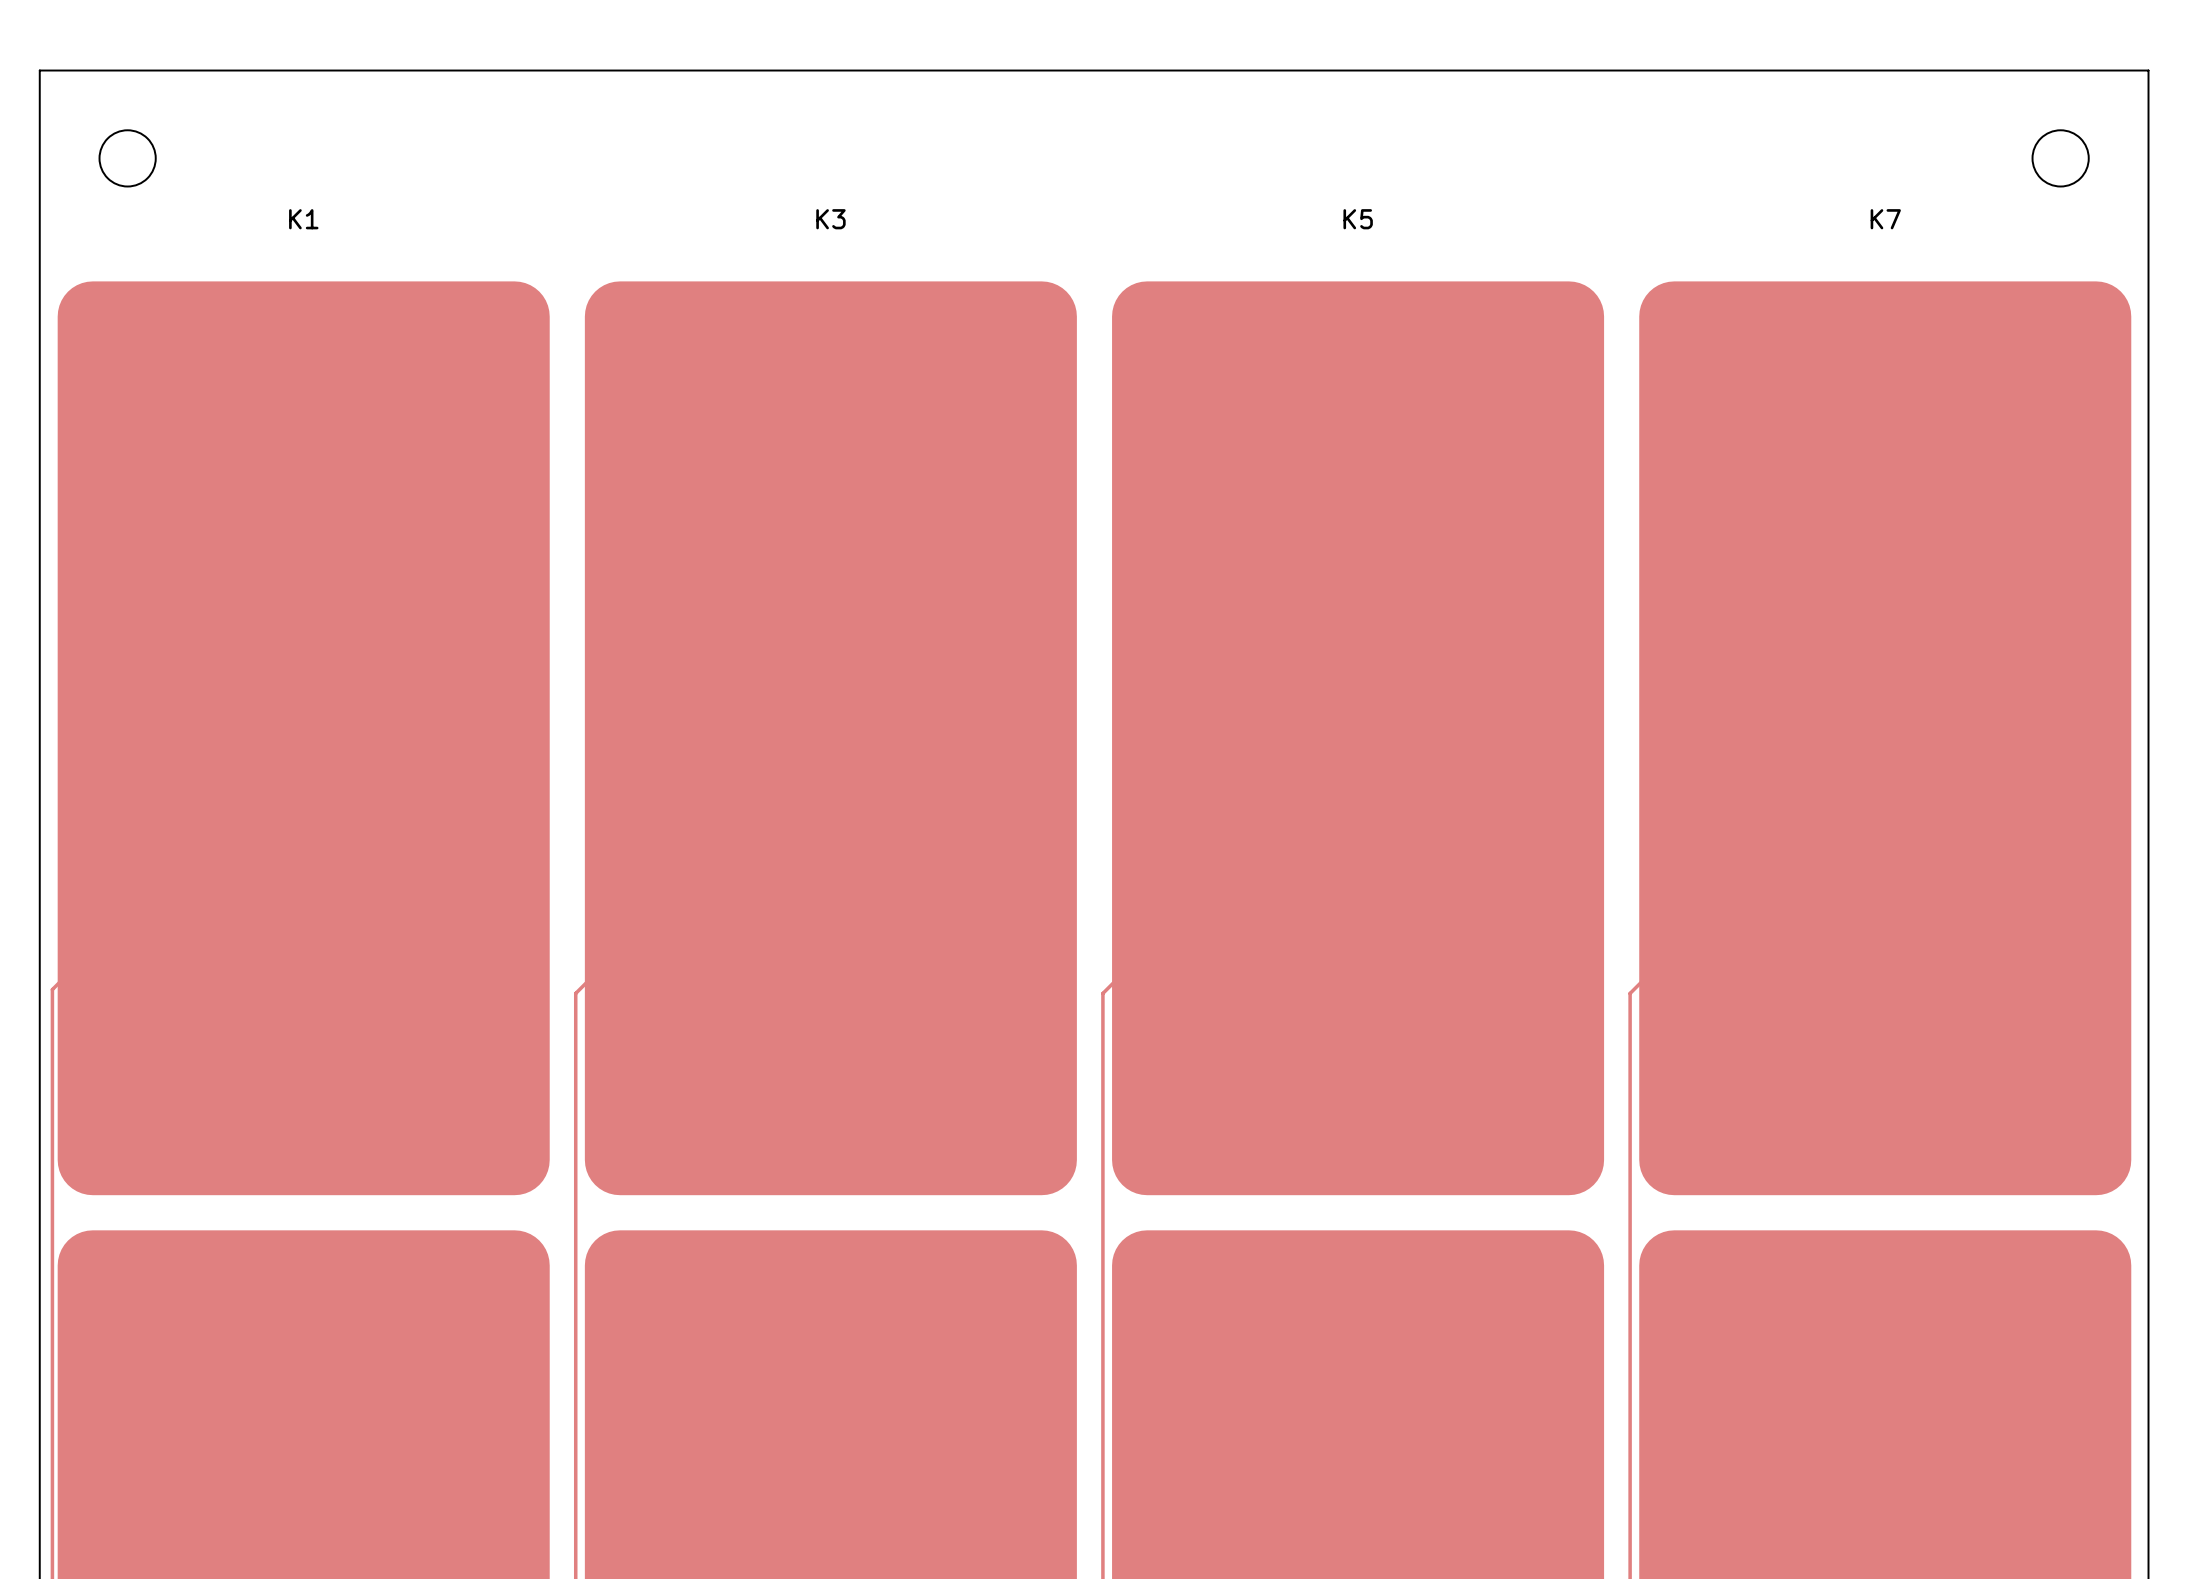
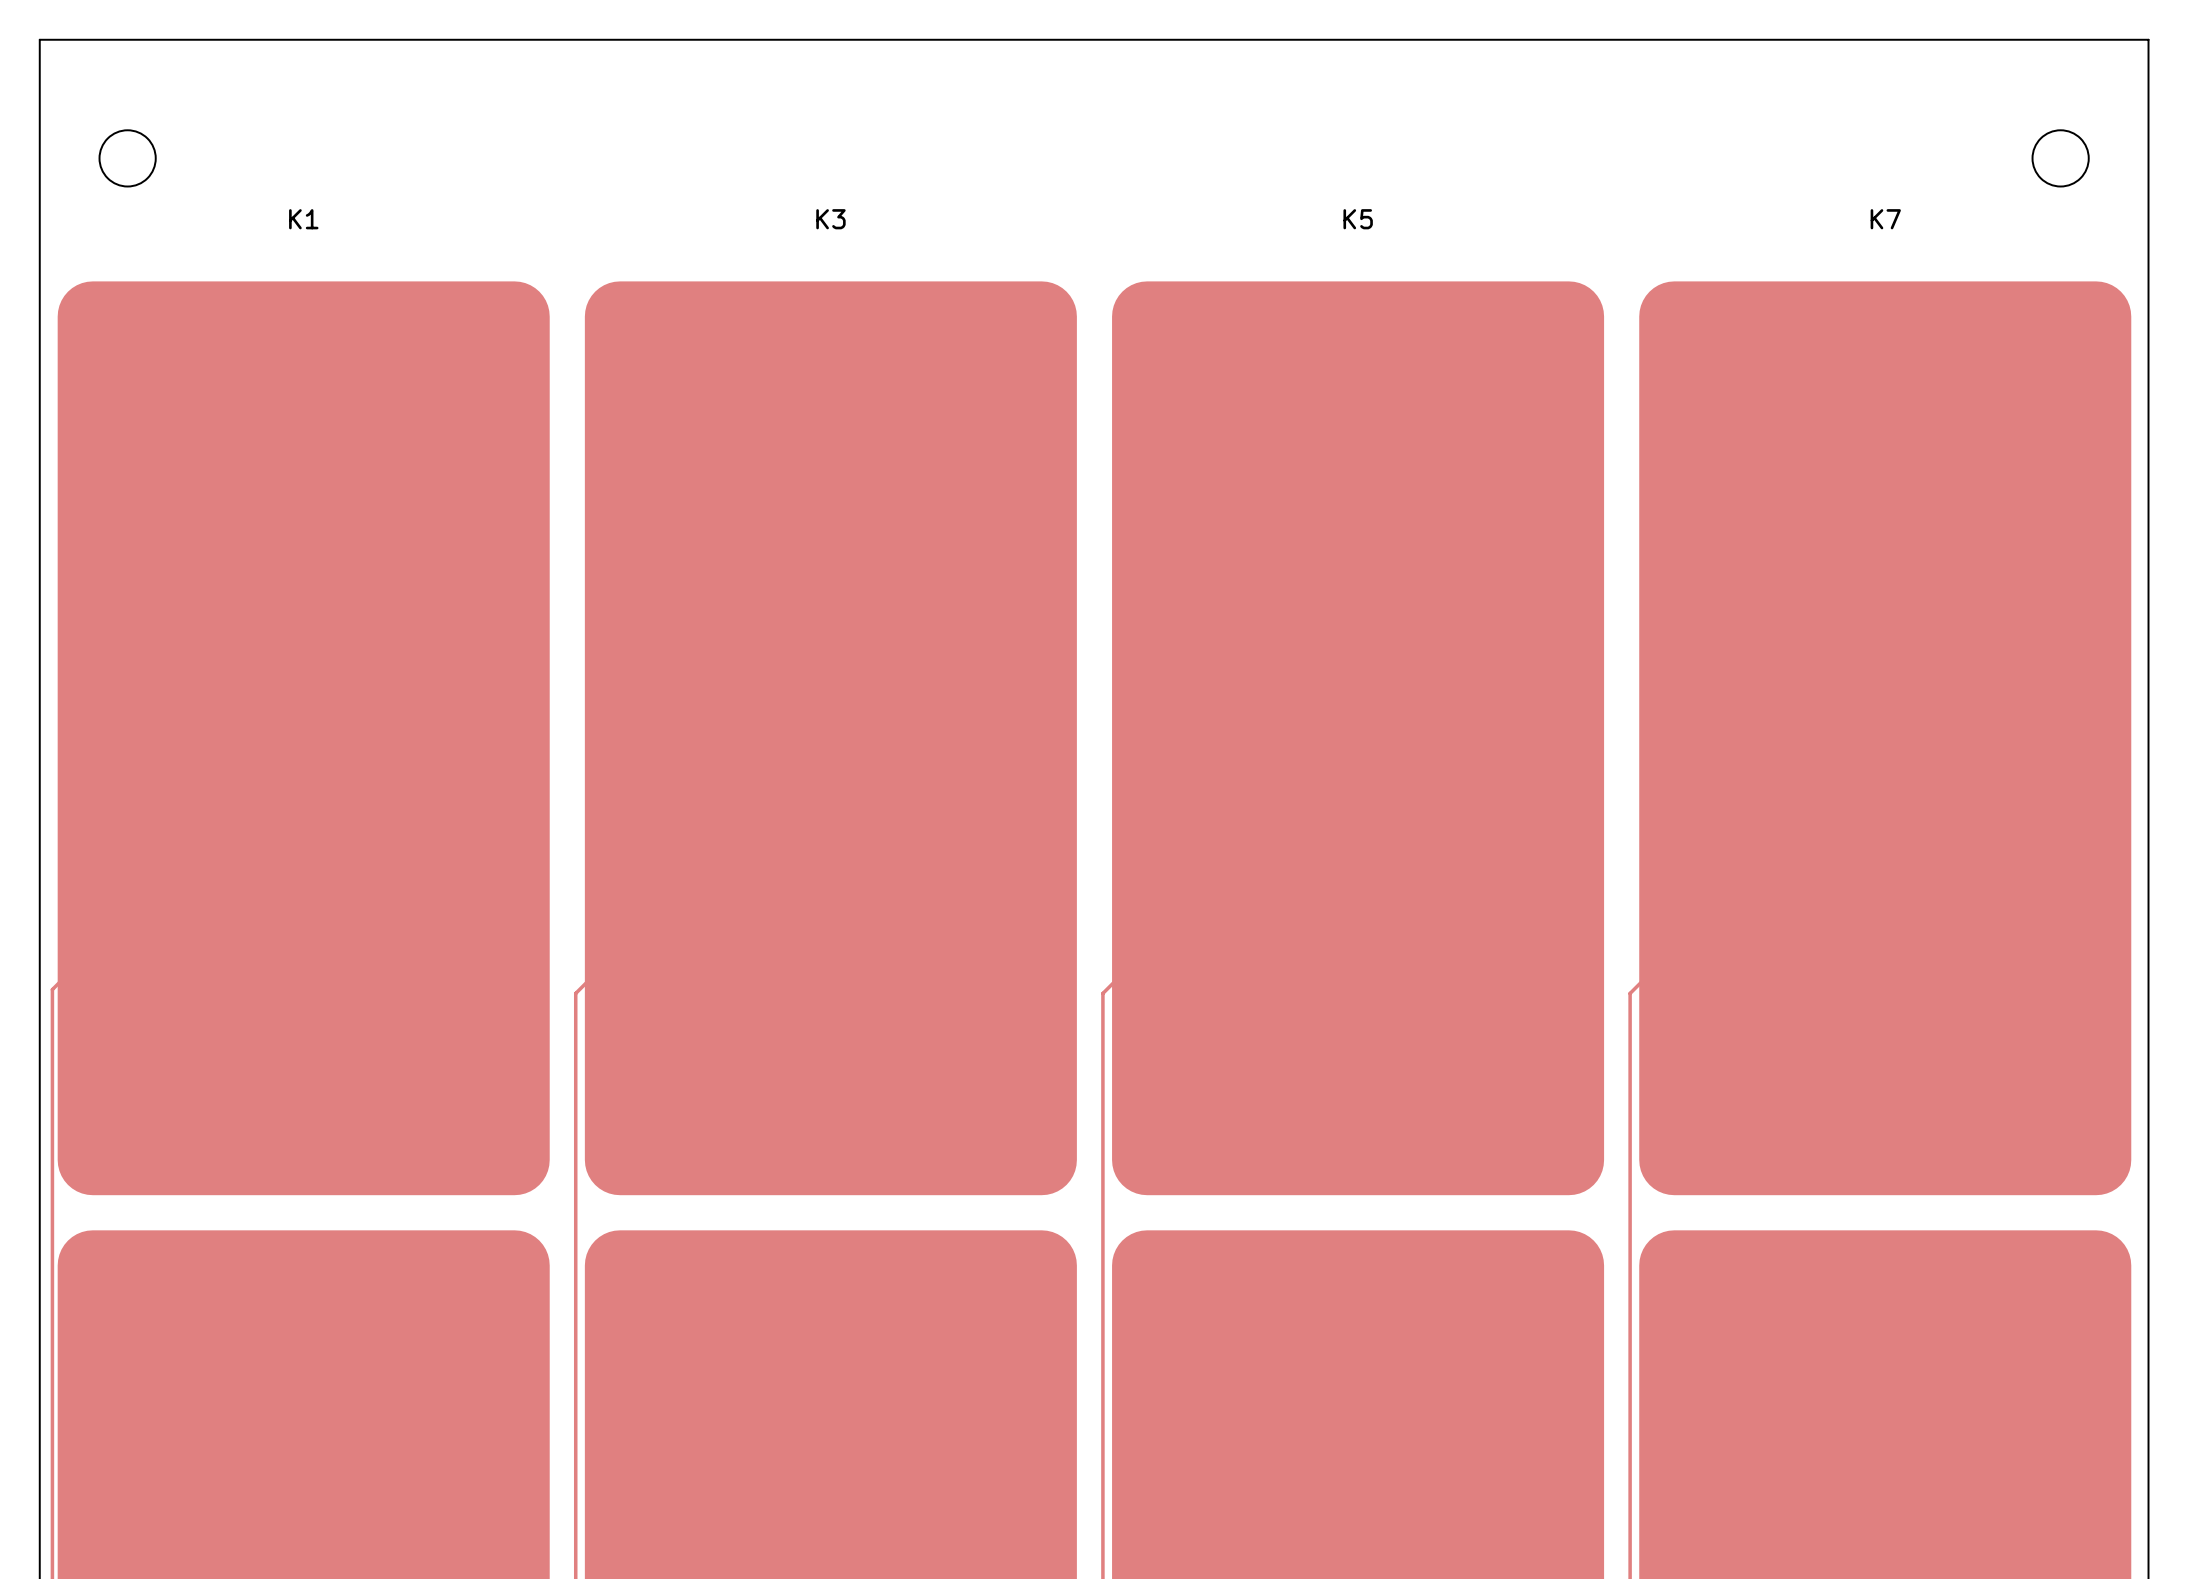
board edge: (39, 70) (2148, 70) -> (39, 70) (39, 39) (2148, 39) (2148, 70)

